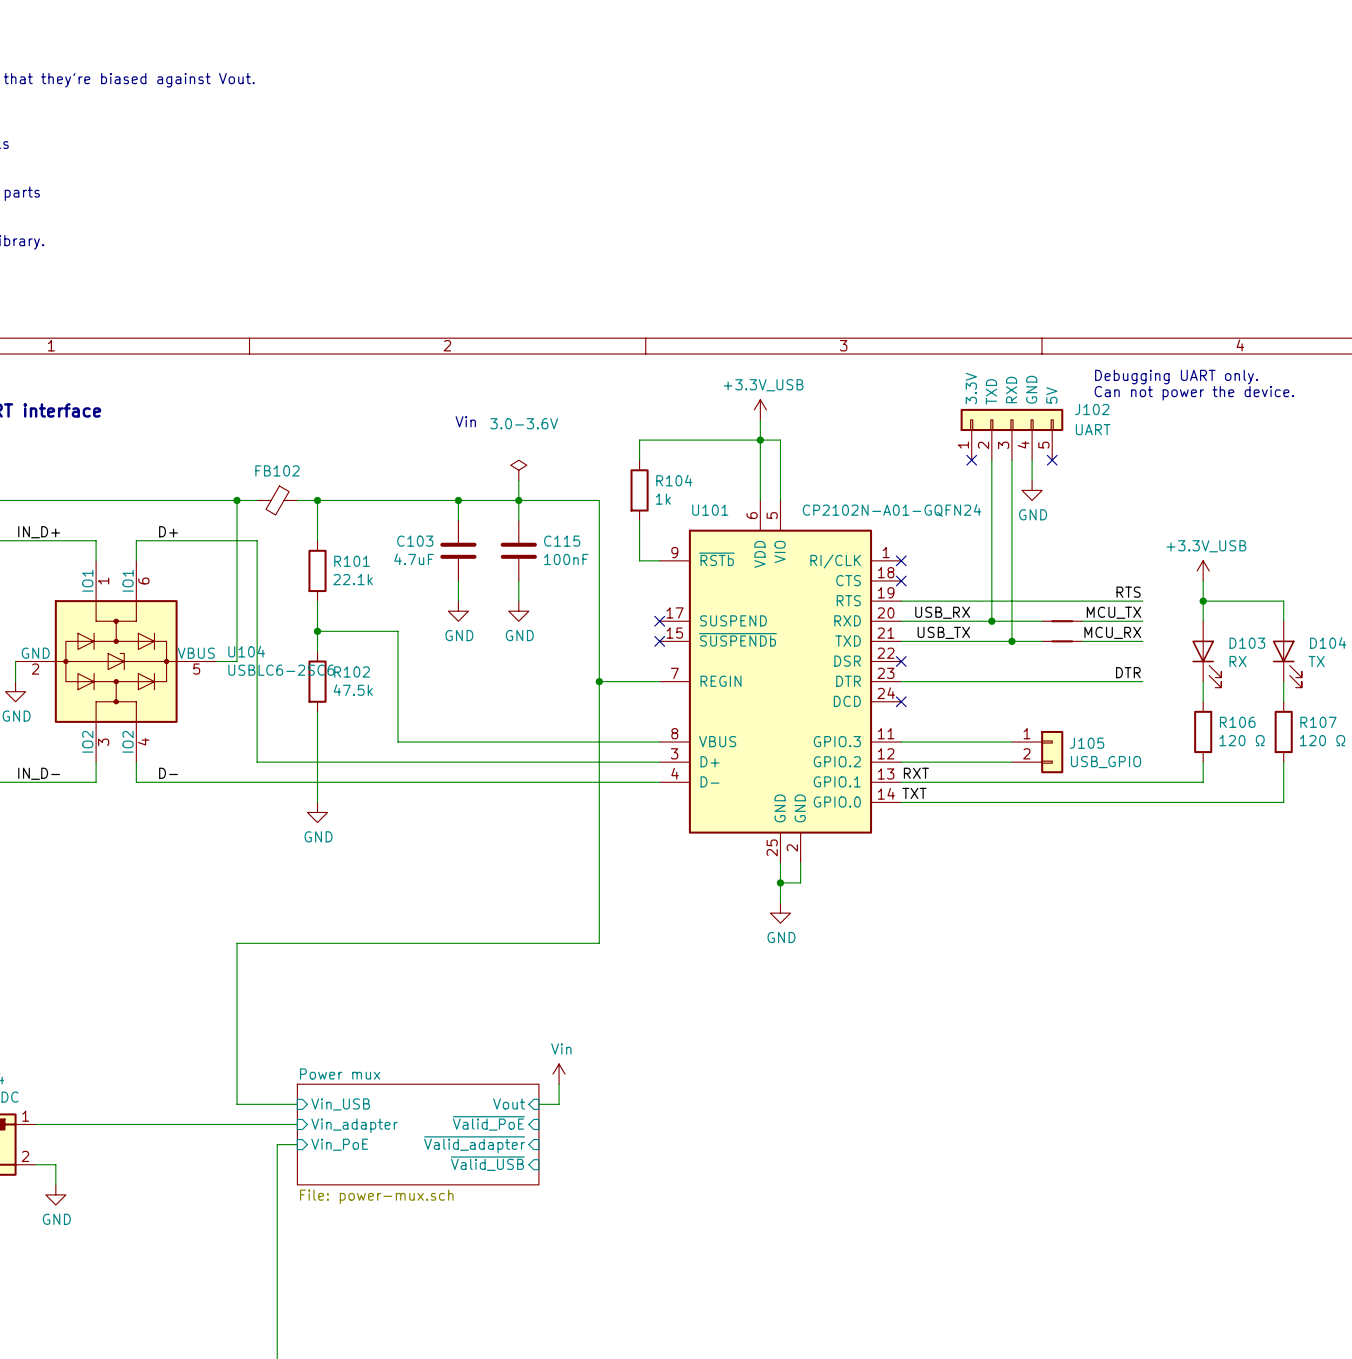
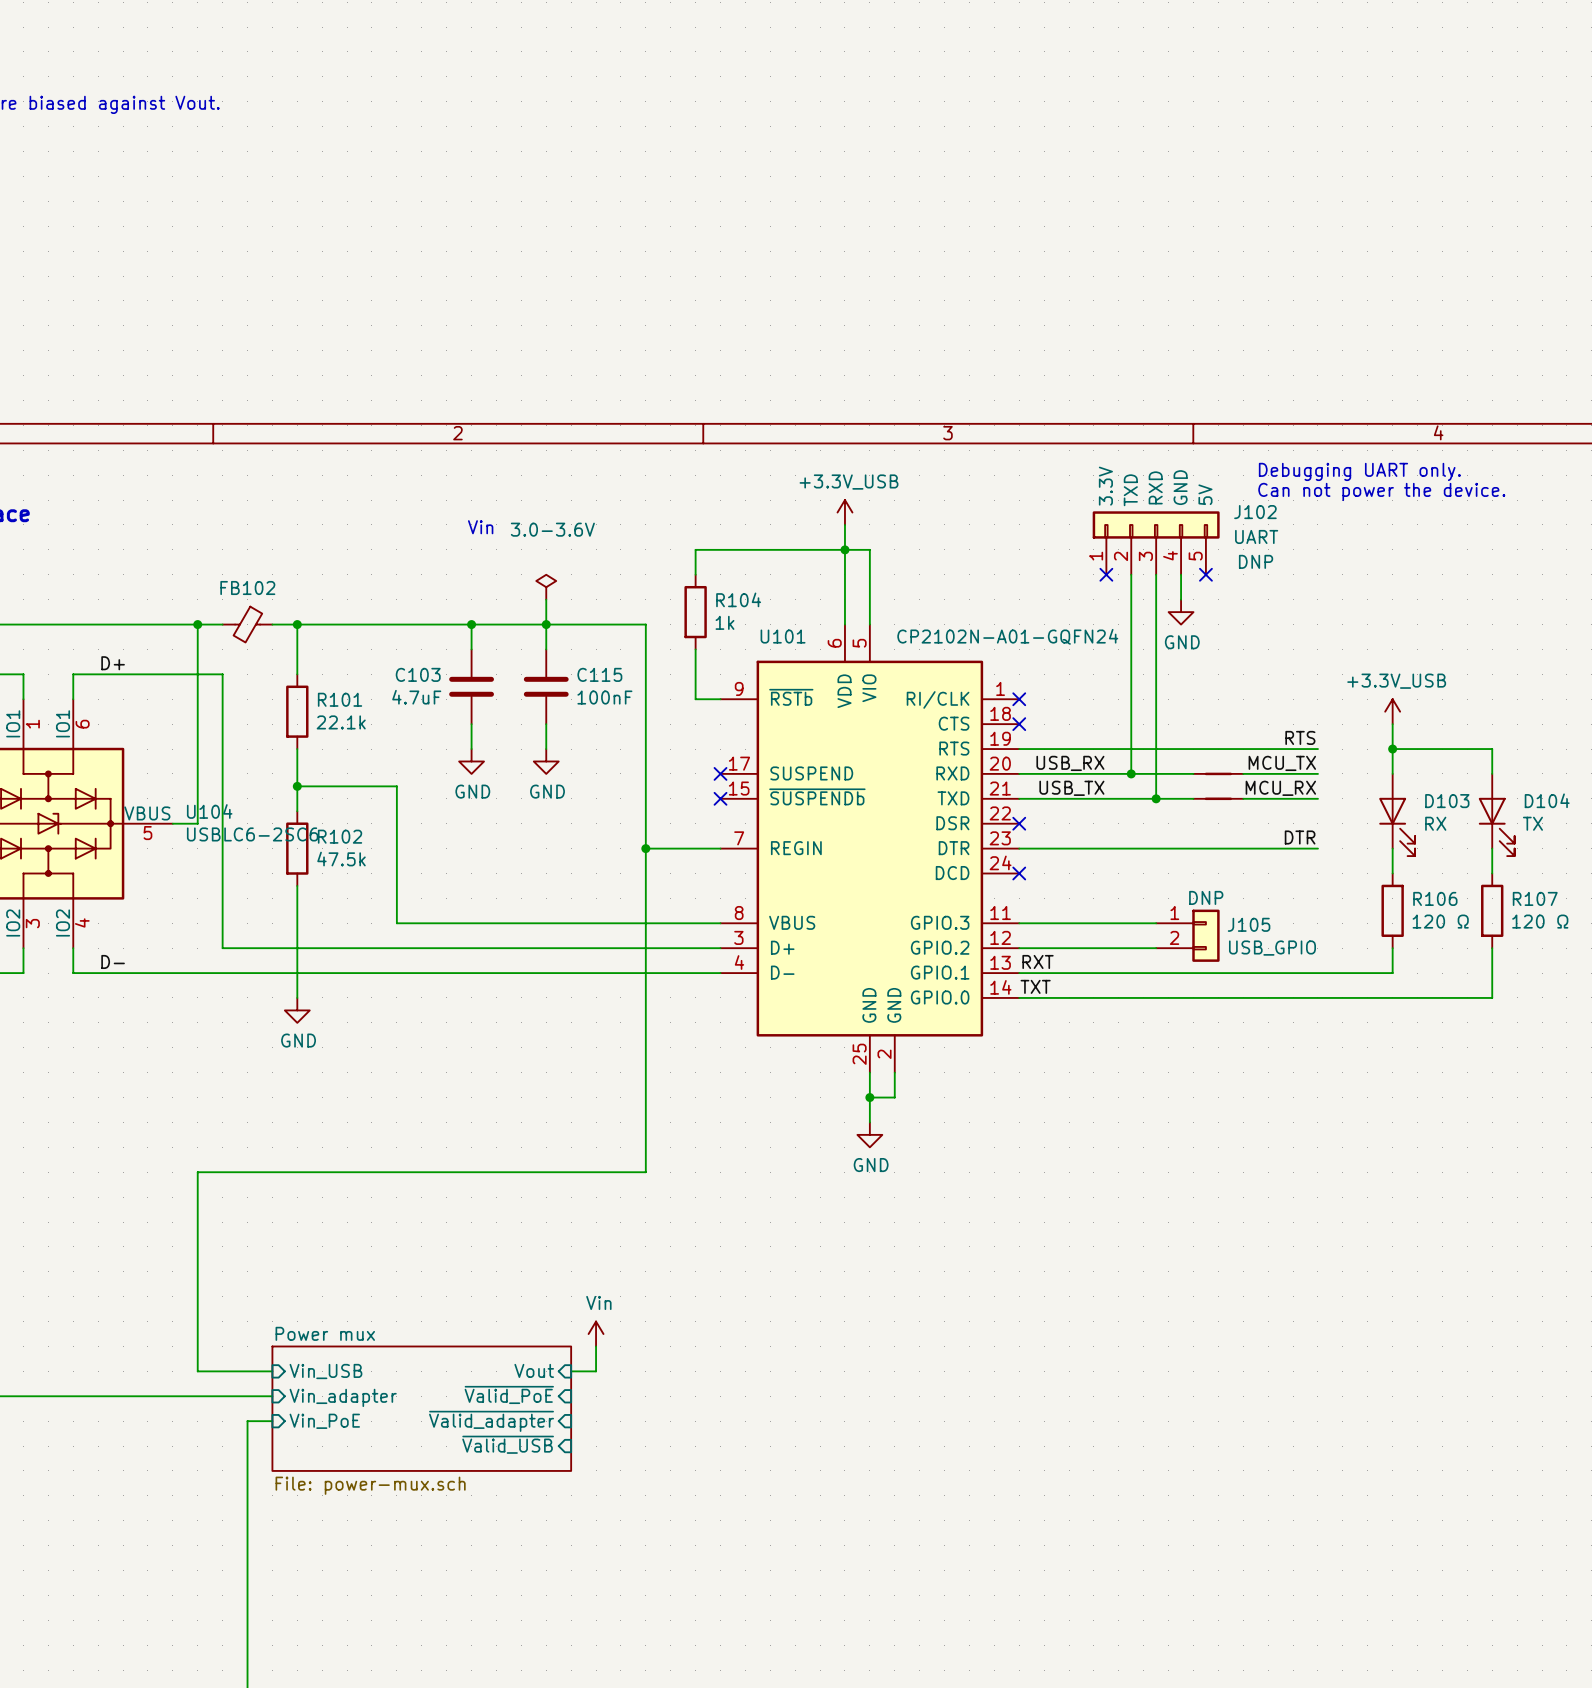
J102 text: none -> DNP (1256, 561)
J105 text: none -> DNP (1206, 897)

